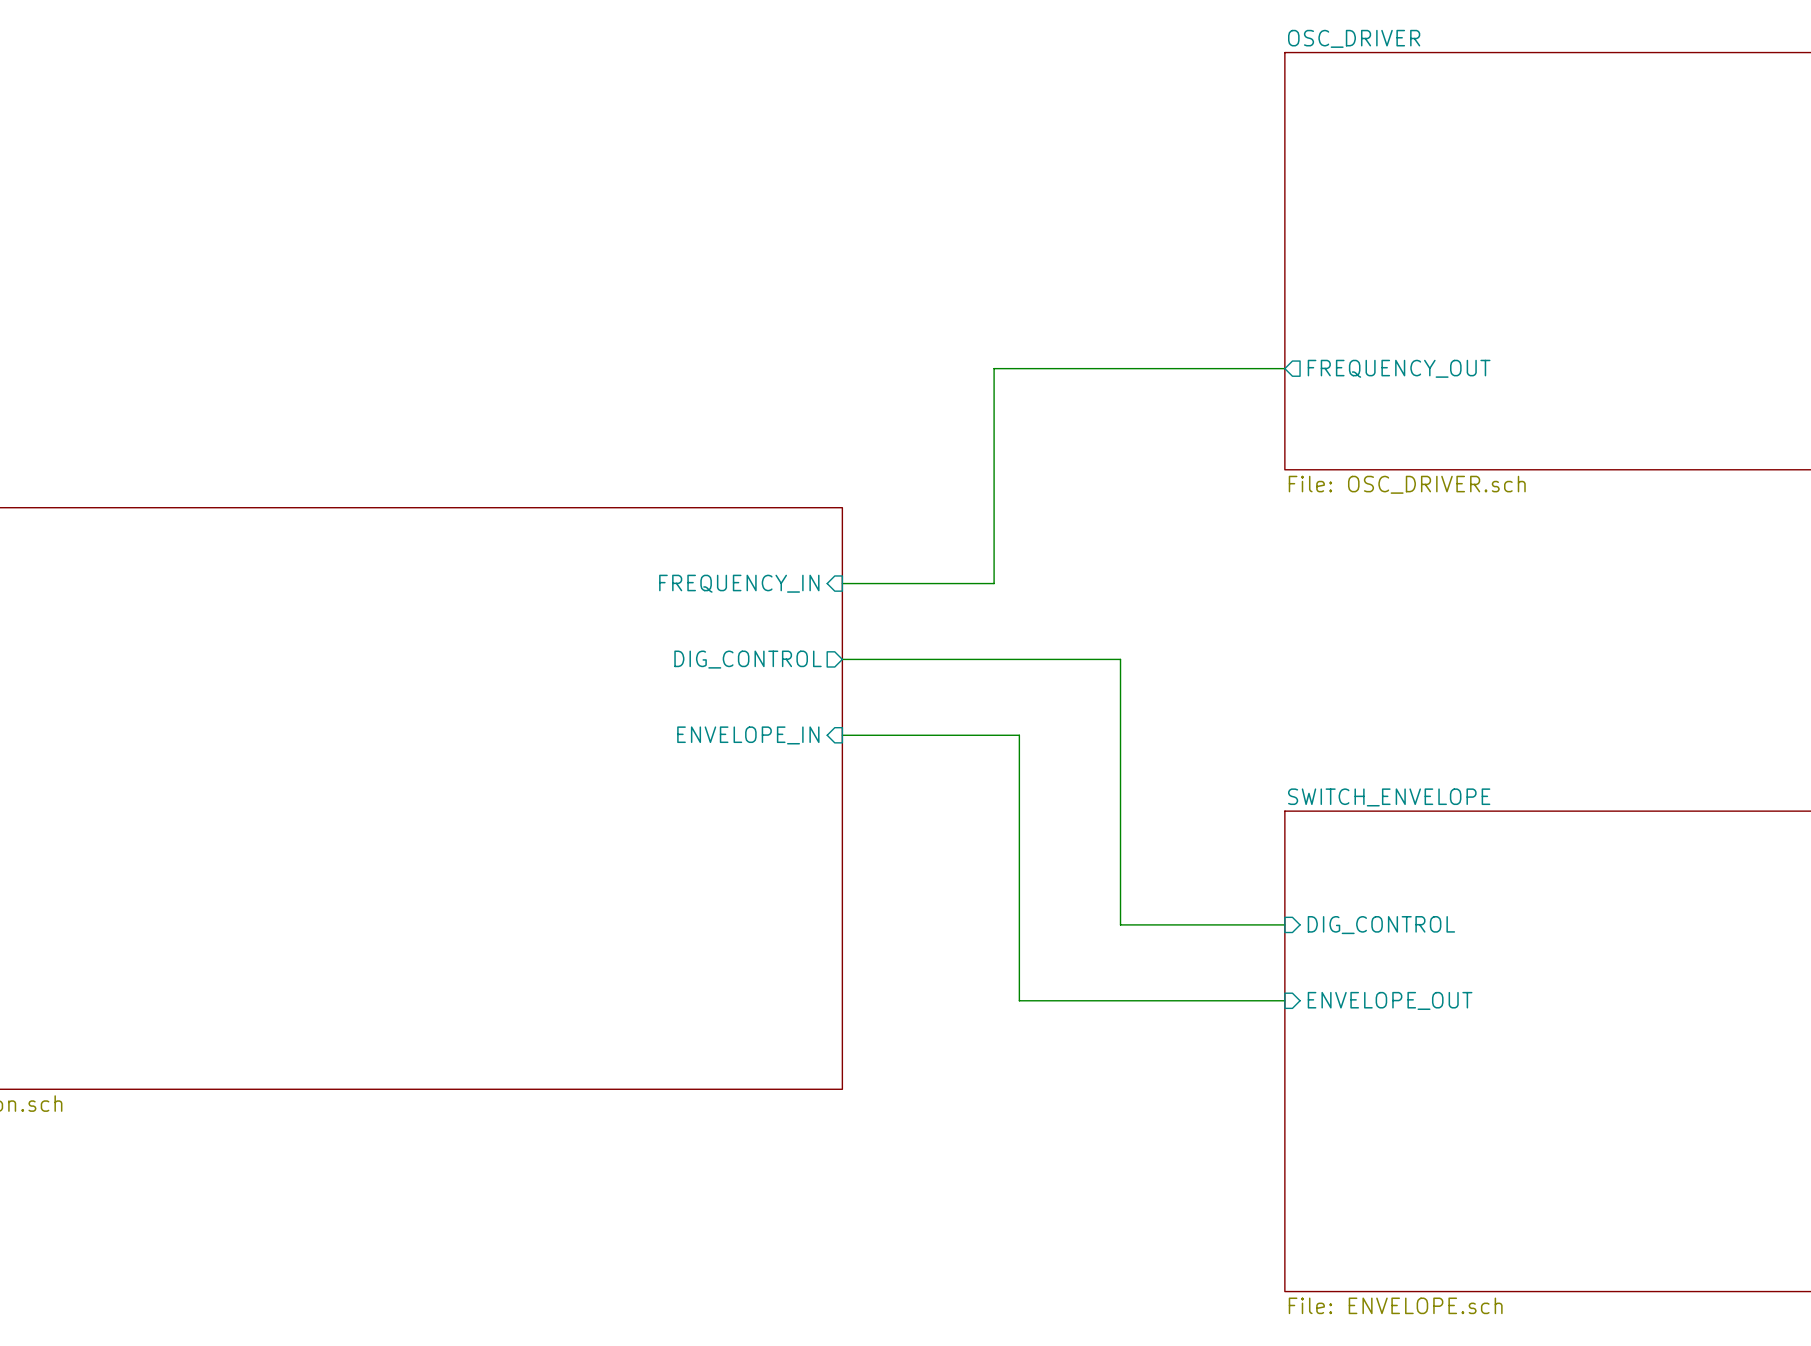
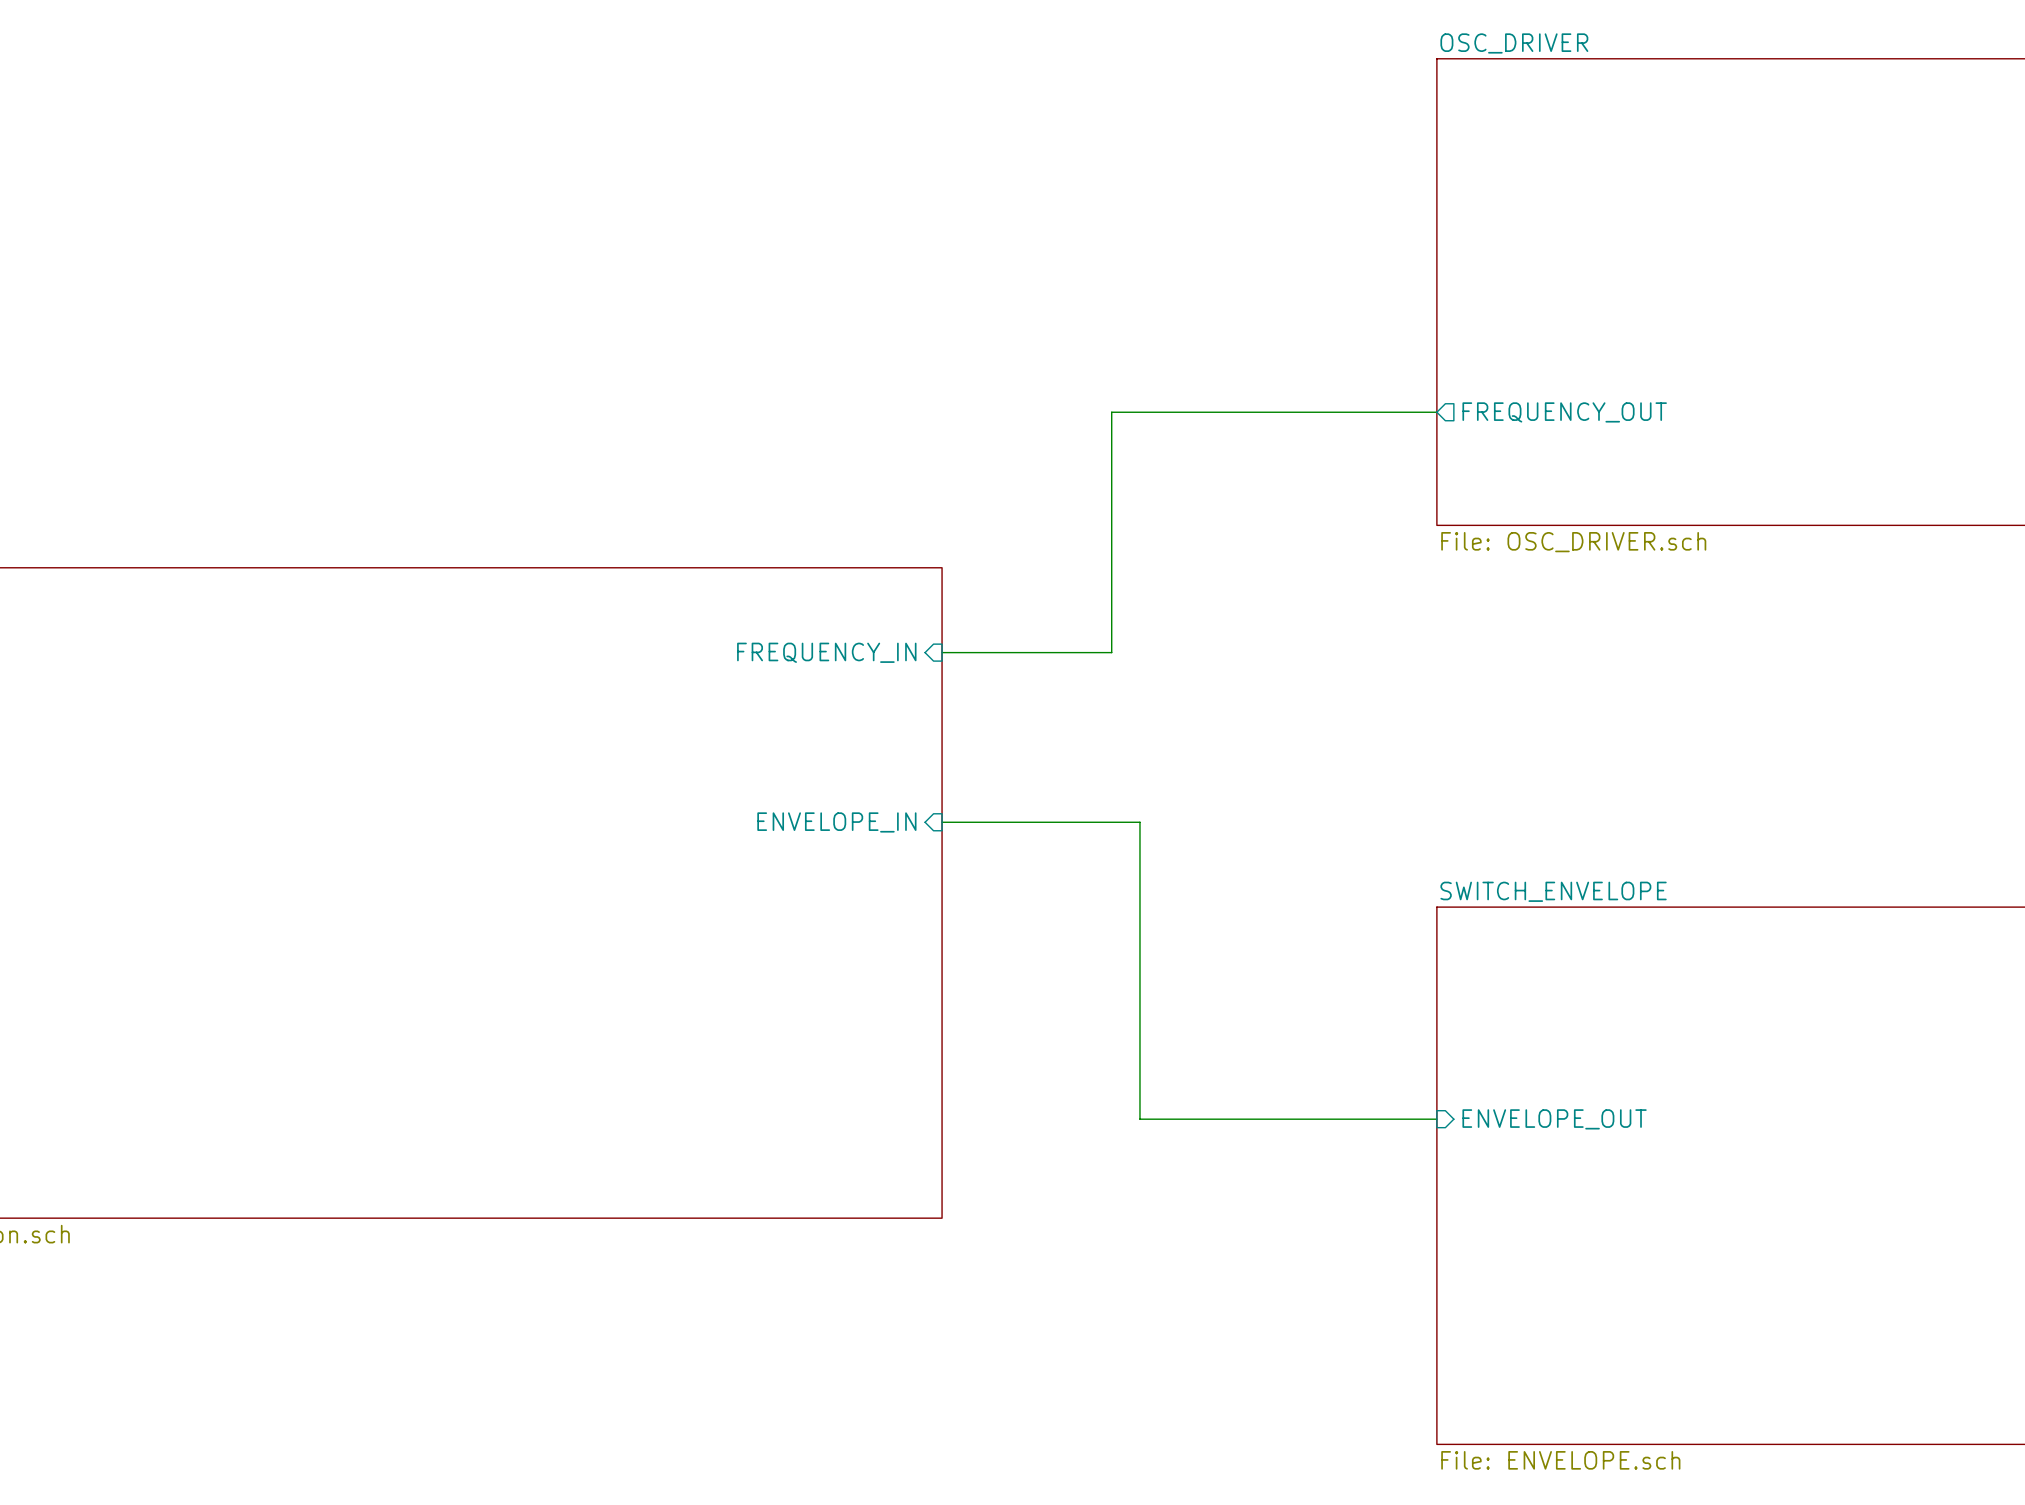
sheet pin: DIG_CONTROL (747, 659) -> none
wire: (842, 659) (1120, 659) (1120, 924) (1284, 924) -> none
sheet pin: DIG_CONTROL (1381, 925) -> none

